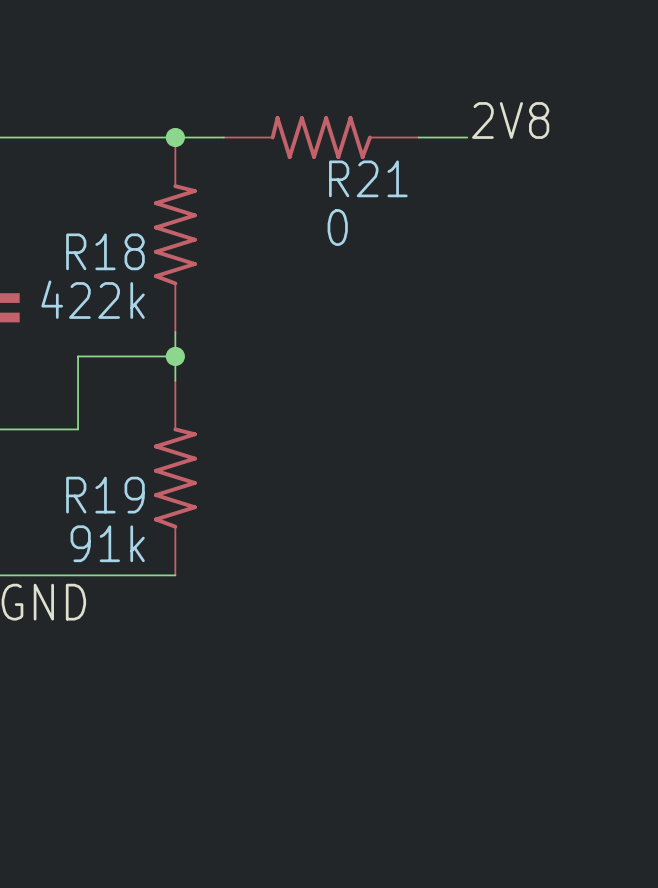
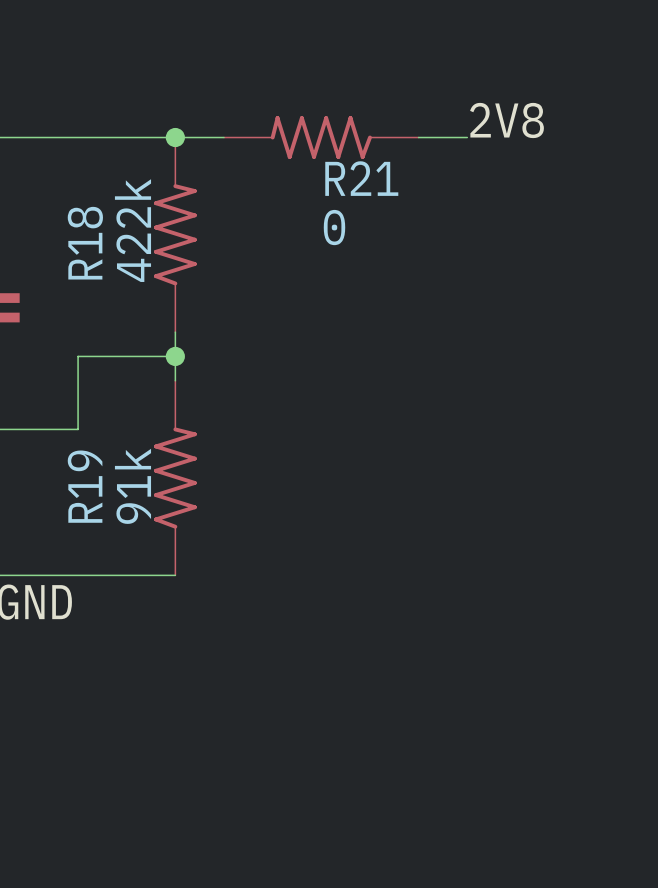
R18 name rotation: 0° (105, 251) -> 90° counterclockwise (85, 243)
R18 value rotation: 0° (93, 299) -> 90° counterclockwise (132, 230)
R19 name rotation: 0° (105, 495) -> 90° counterclockwise (85, 486)
R19 value rotation: 0° (107, 543) -> 90° counterclockwise (132, 486)

